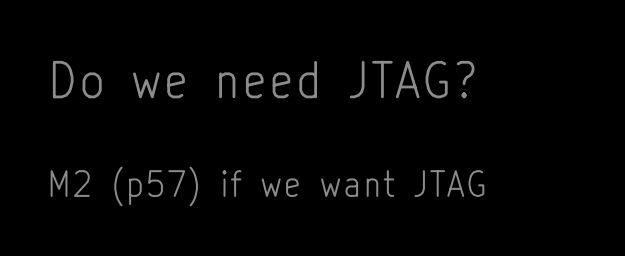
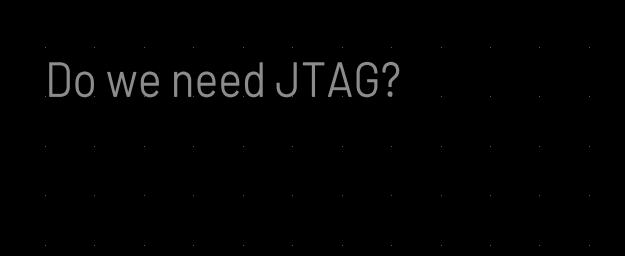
text: M2 (p57) if we want JTAG (267, 186) -> none

